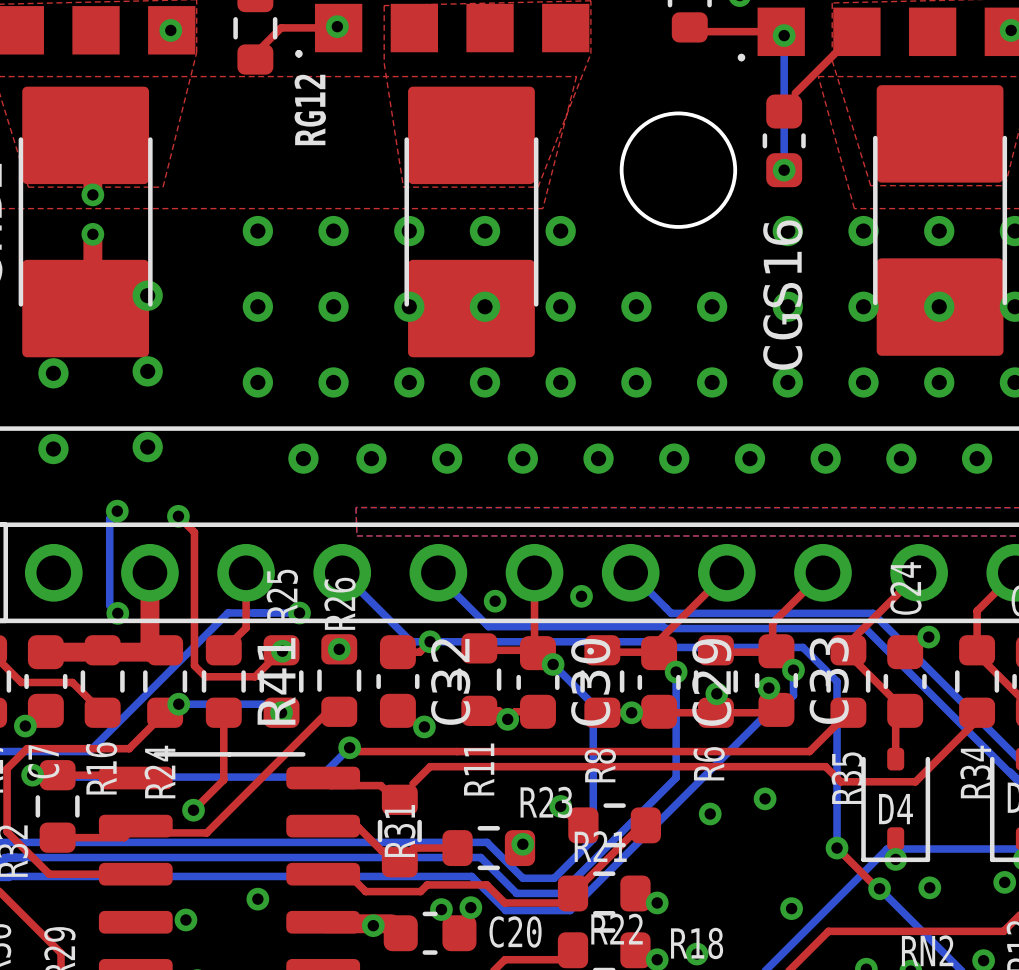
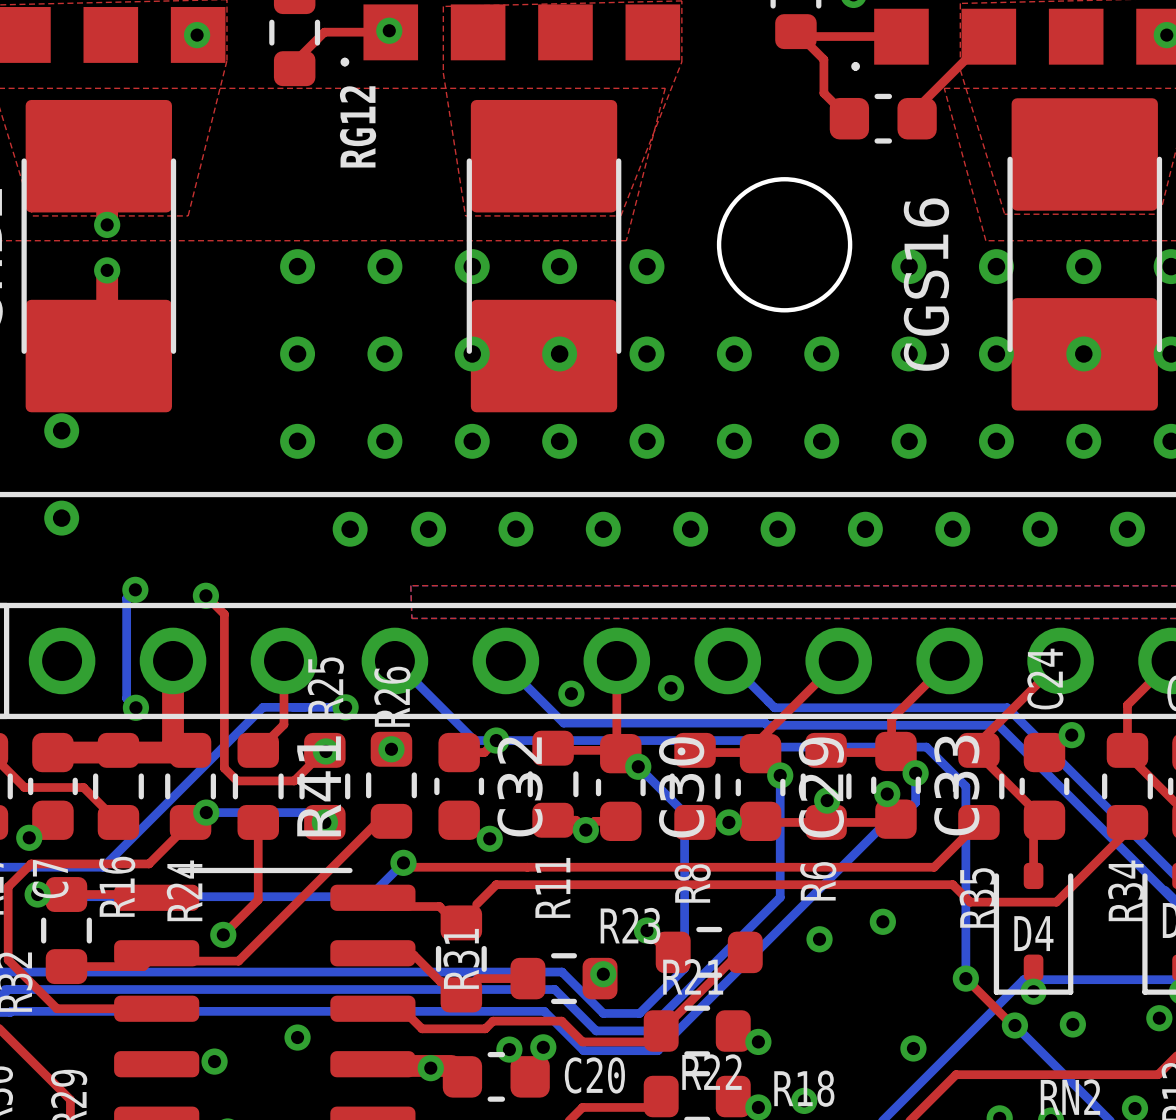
top track: none -> (800, 36) (823, 59) (823, 93) (849, 118)
bottom track: (784, 35) (784, 170) -> none
via: (784, 35) -> none
CGS16 rotation: 0° (784, 140) -> 90° clockwise (883, 118)
round board edge position: (678, 170) -> (784, 244)
via: (784, 170) -> none
via: (147, 295) -> none
via: (147, 371) -> none
via: (147, 447) -> none

